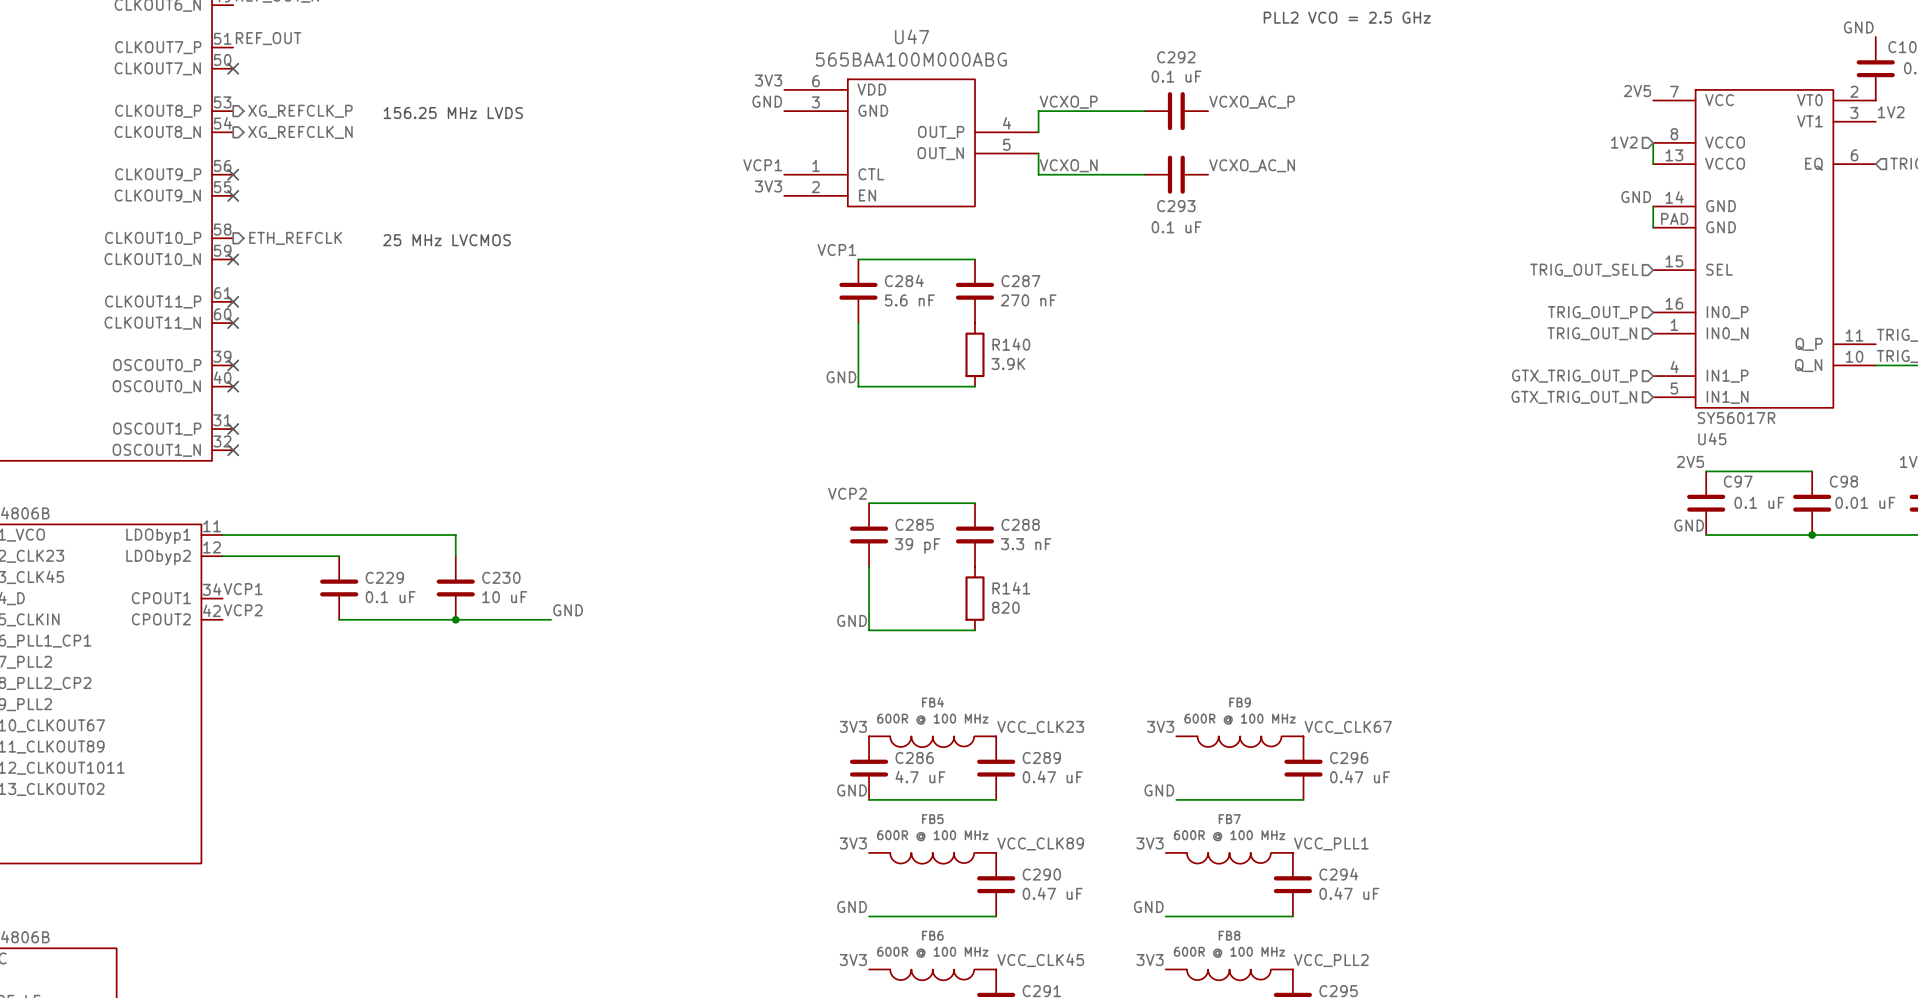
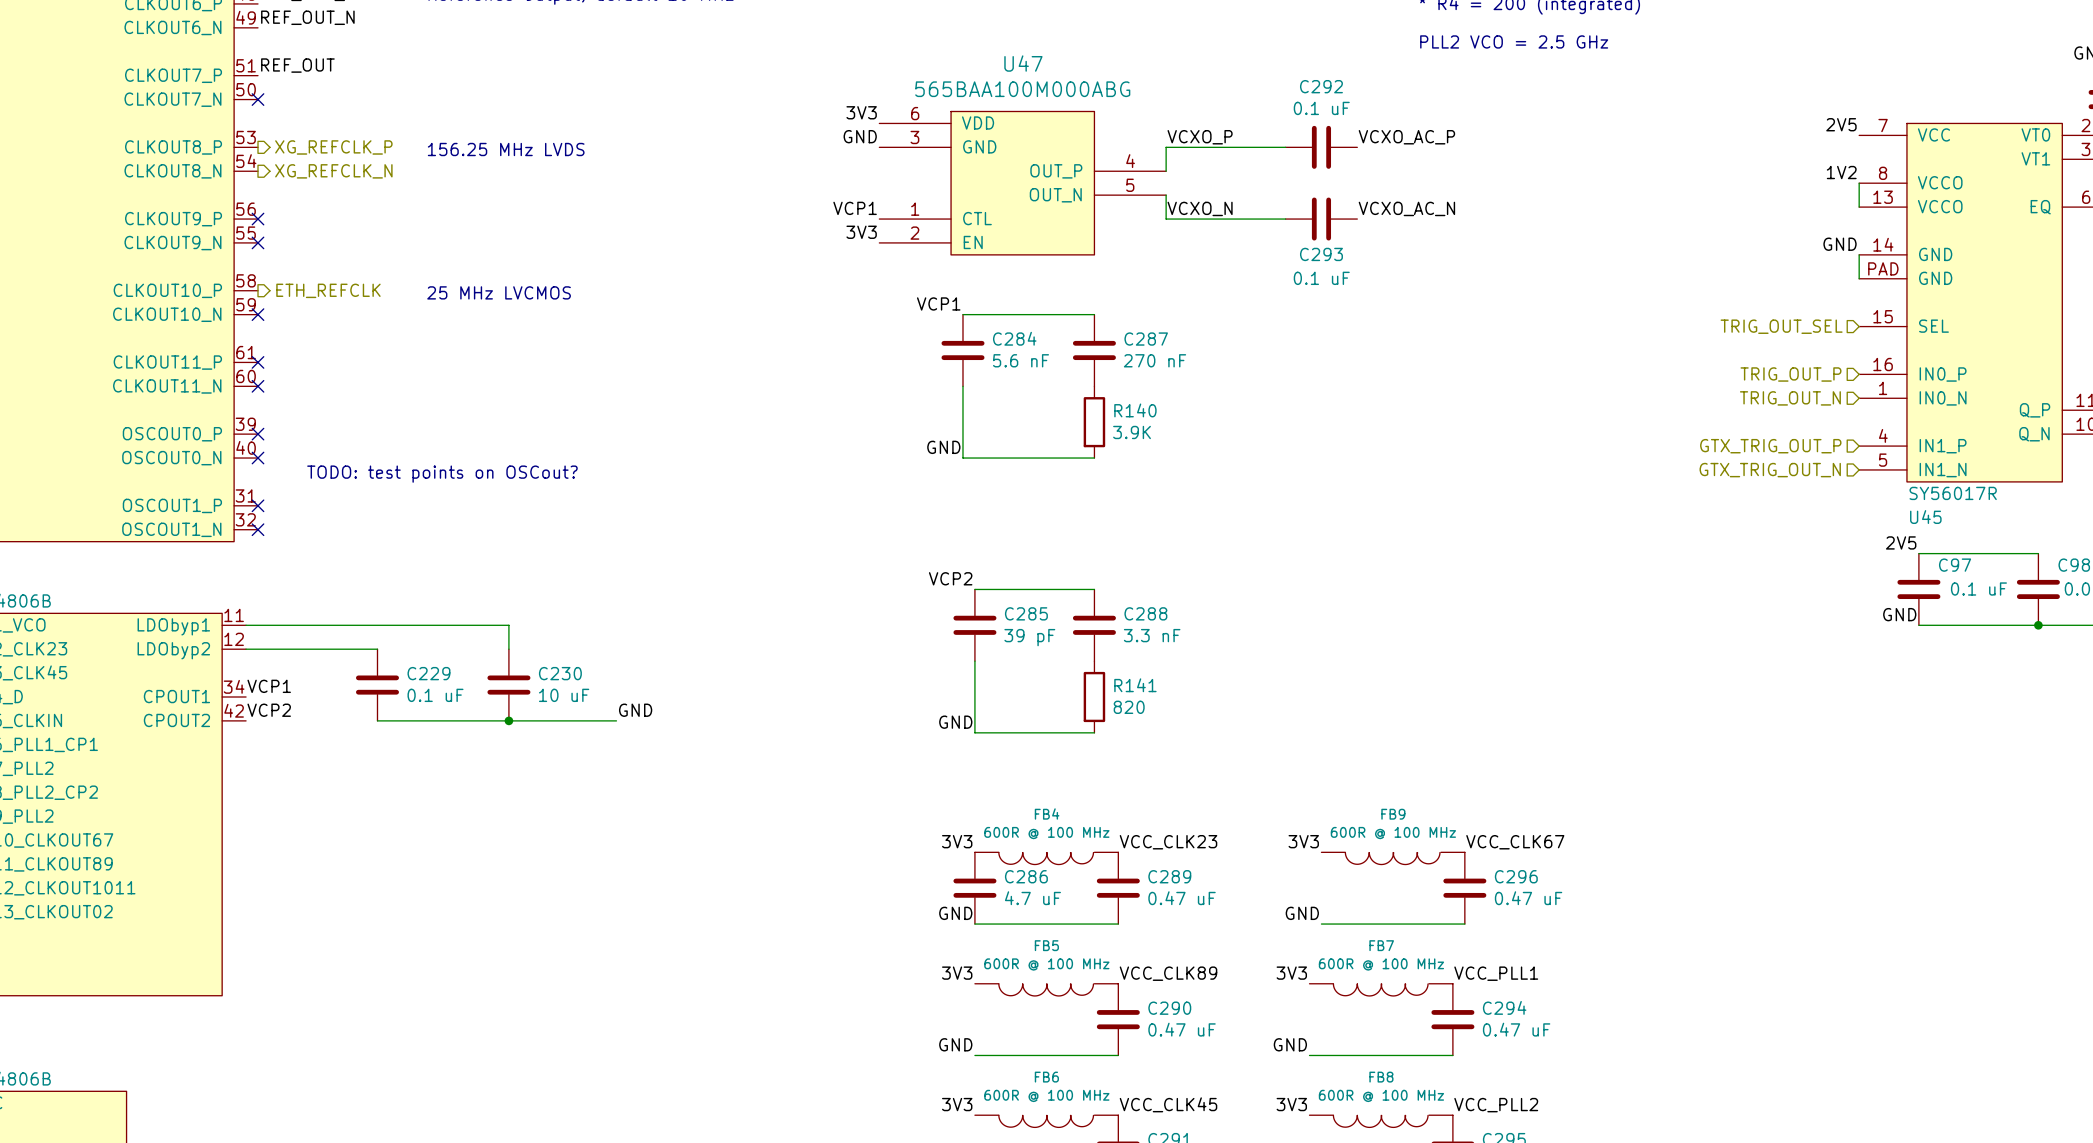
label: none -> 1V2 (1841, 172)
hierarchical label: 1V2 (1624, 142) -> none
text: none -> TODO: test points on OSCout? (442, 474)

